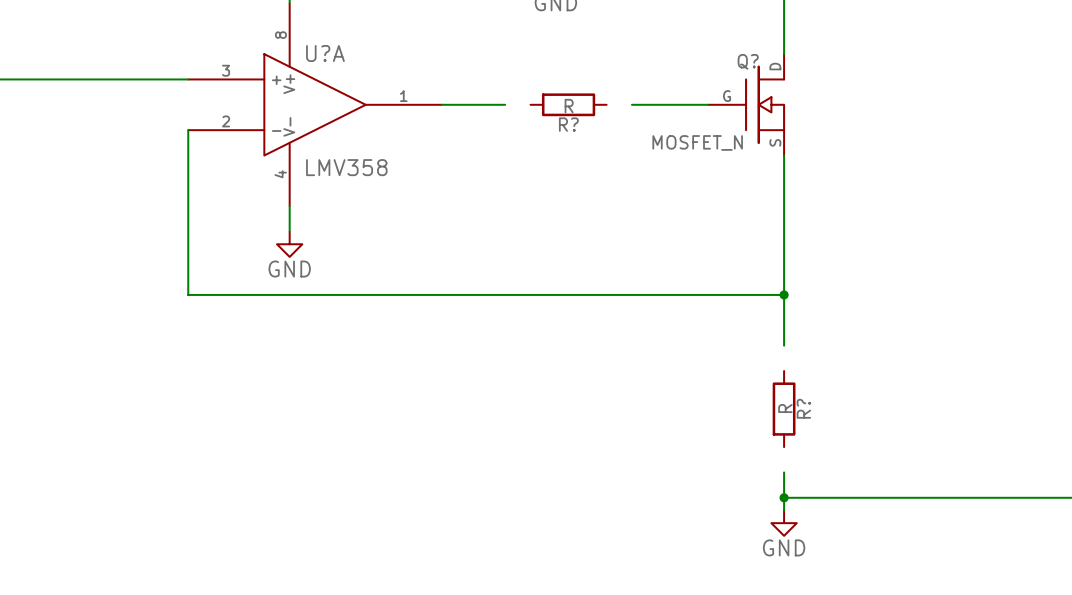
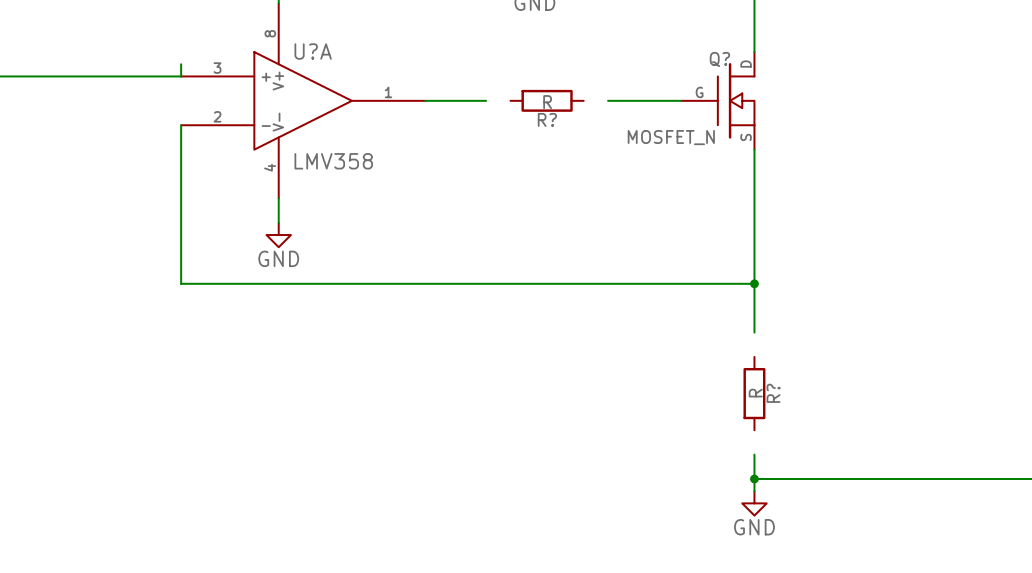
wire: none -> (181, 64) (181, 76)

